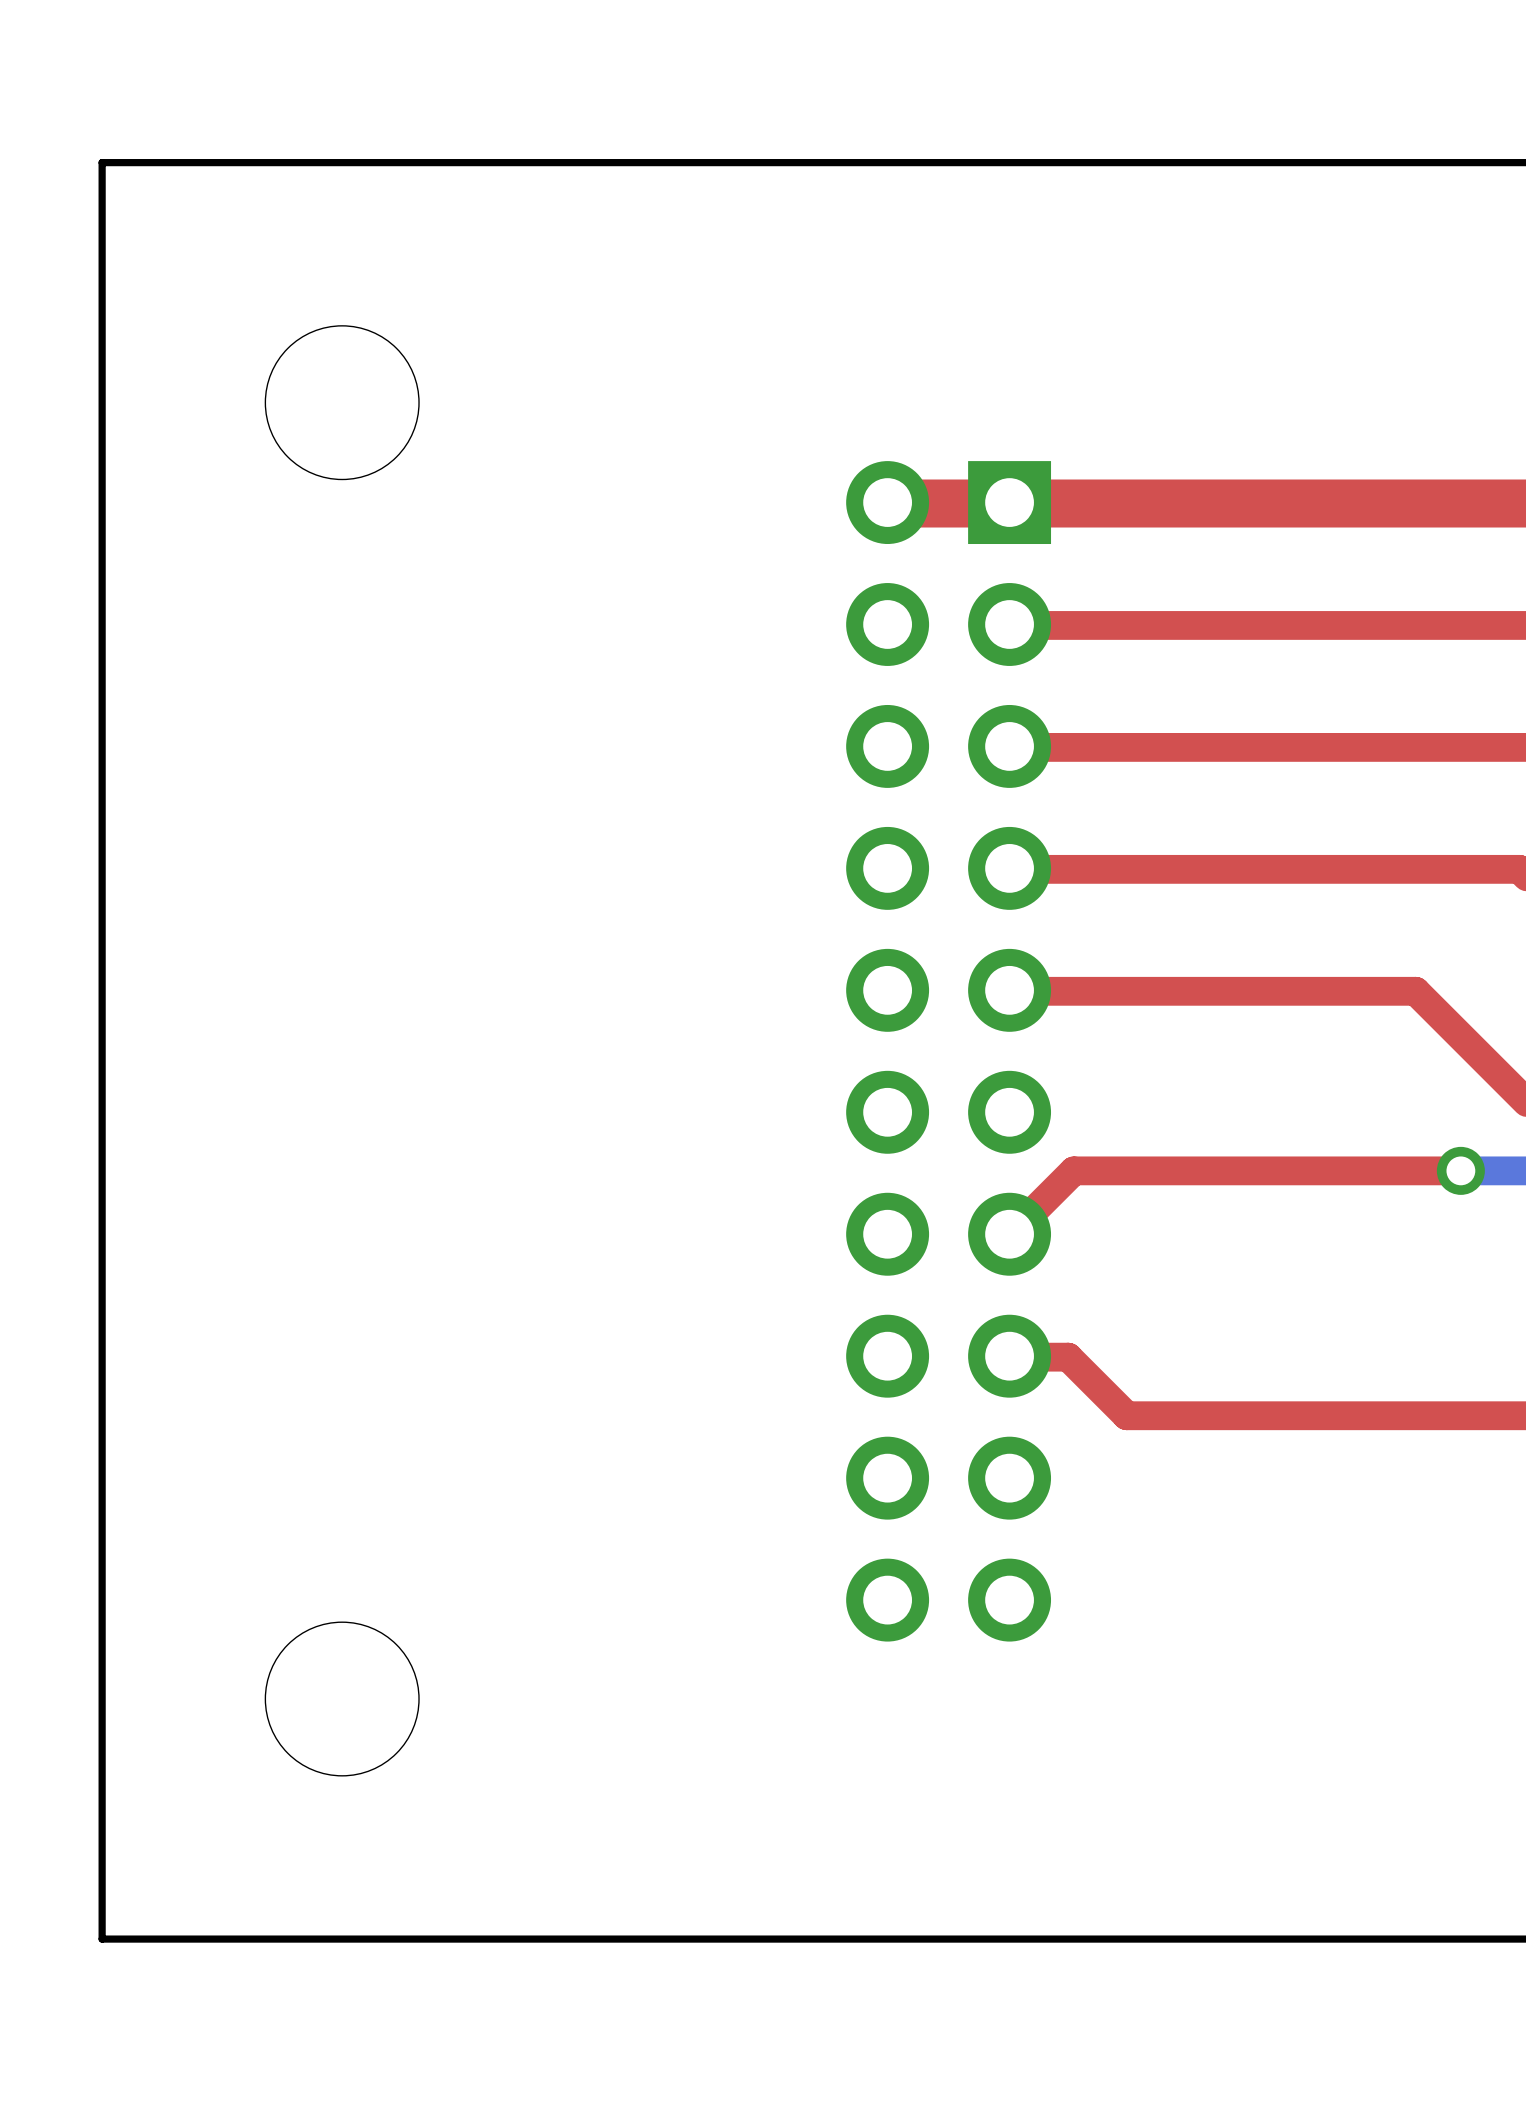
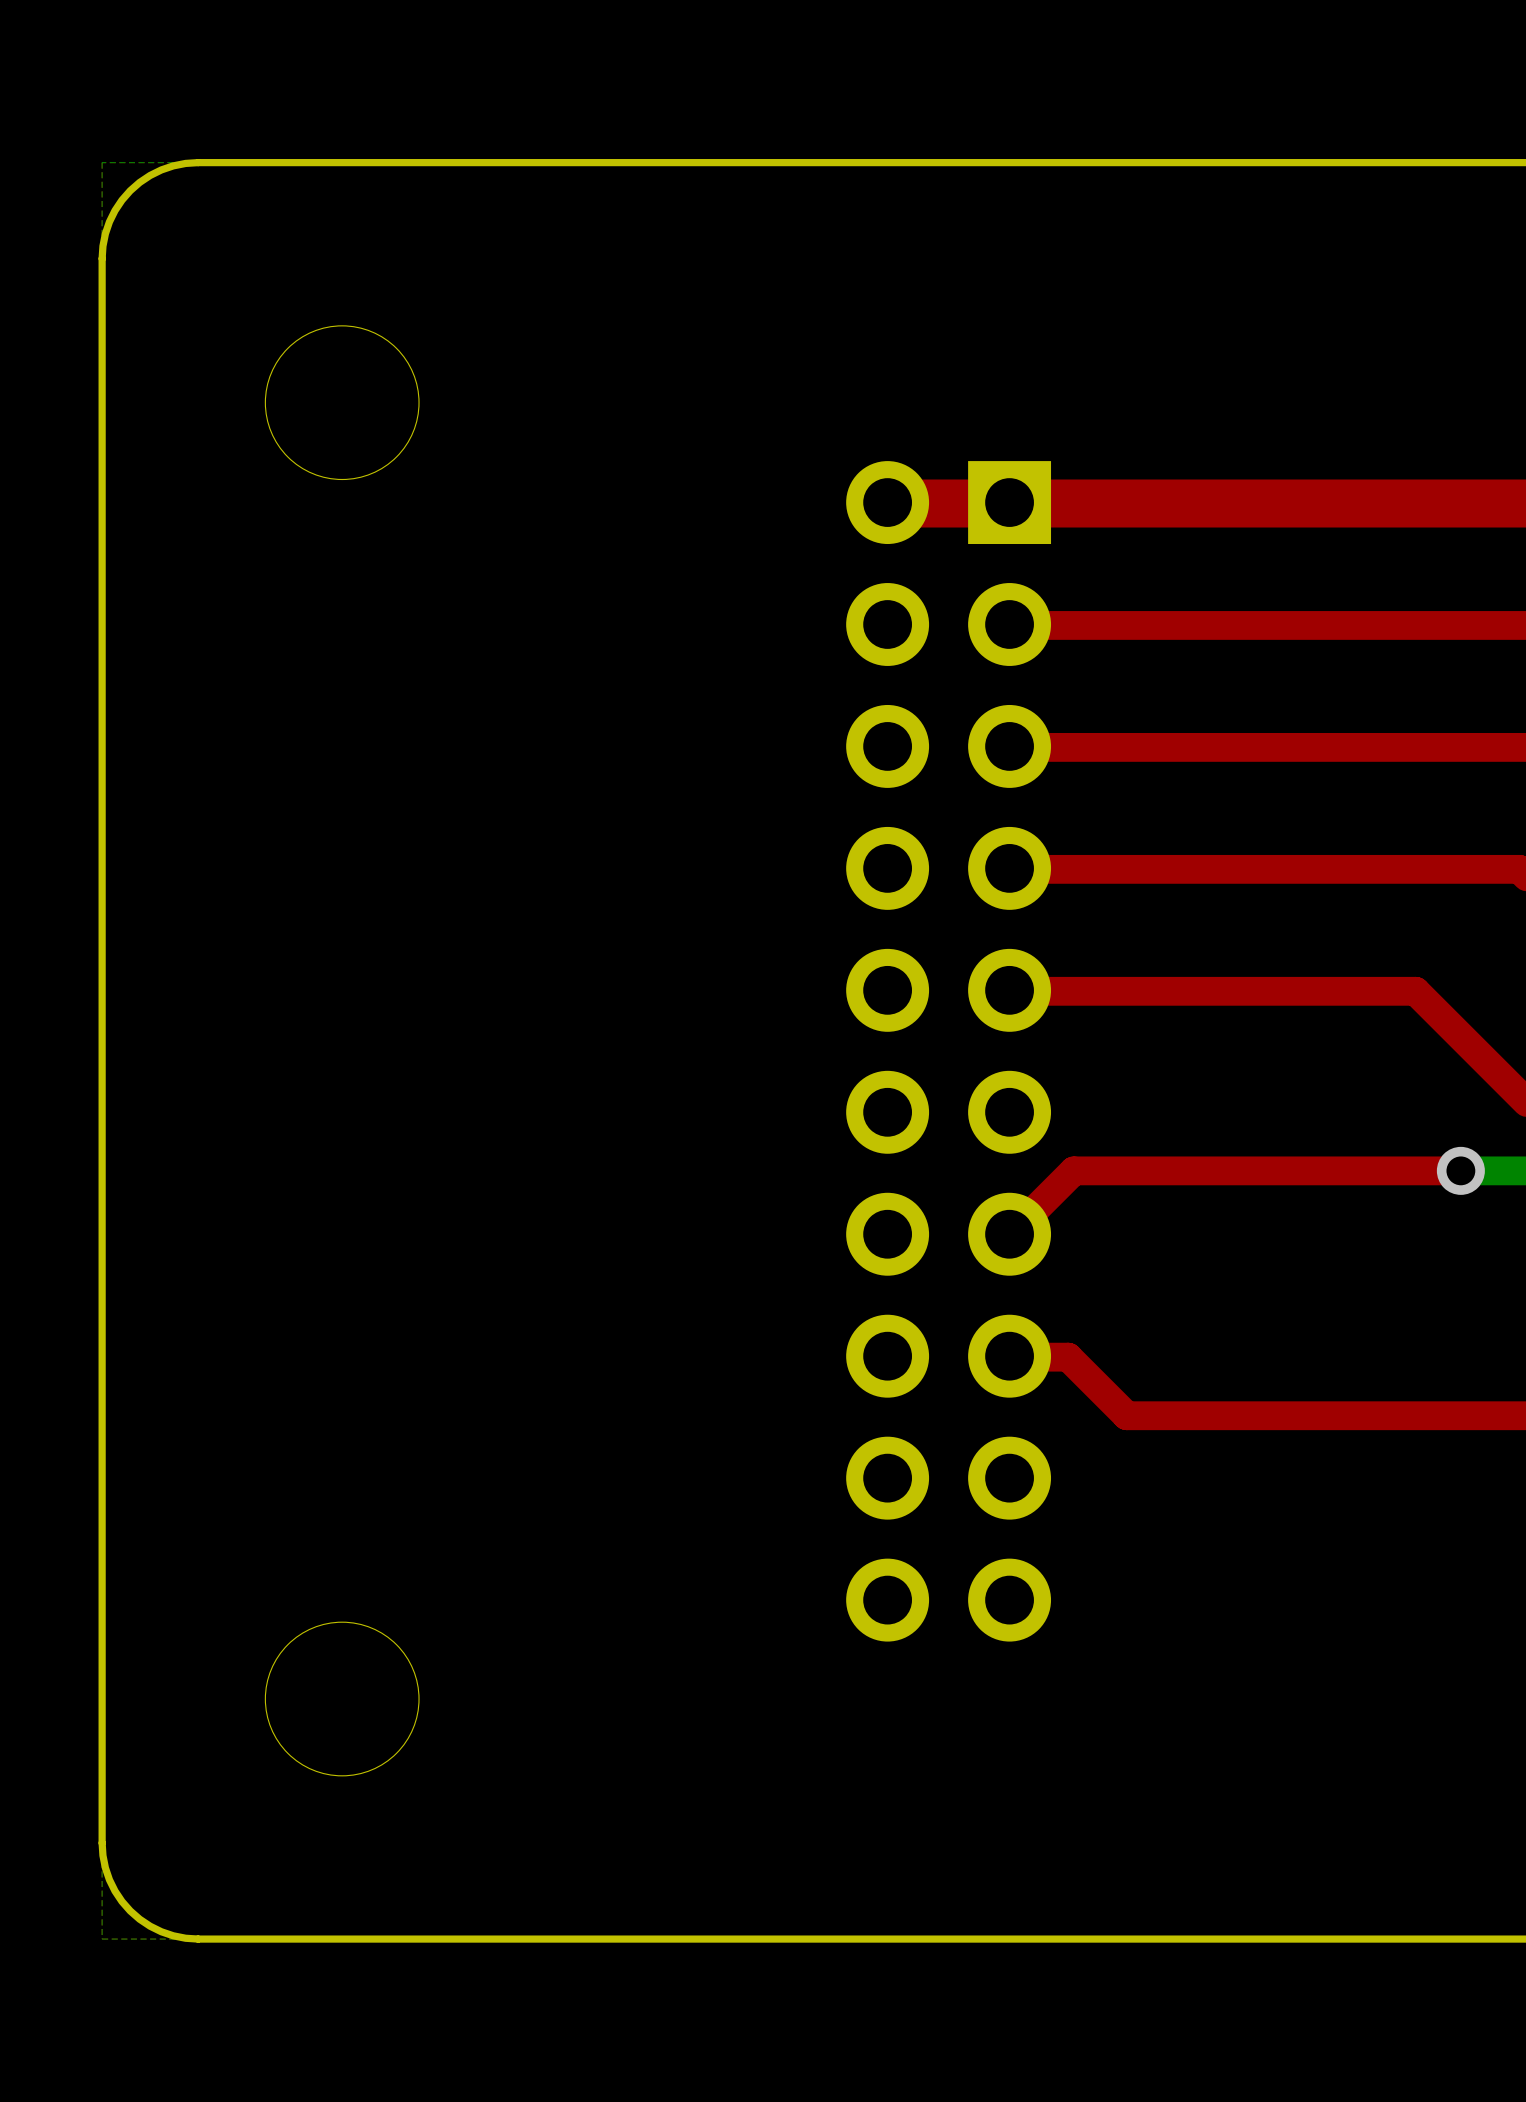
board edge: (198, 162) (102, 162) (102, 258) -> (198, 162) (173, 165) (161, 169) (139, 182) (130, 190) (115, 210) (109, 221) (105, 233) (102, 258)
board edge: (102, 1843) (102, 1939) (198, 1939) -> (102, 1843) (105, 1867) (109, 1879) (115, 1891) (130, 1910) (150, 1926) (161, 1931) (173, 1935) (198, 1939)

